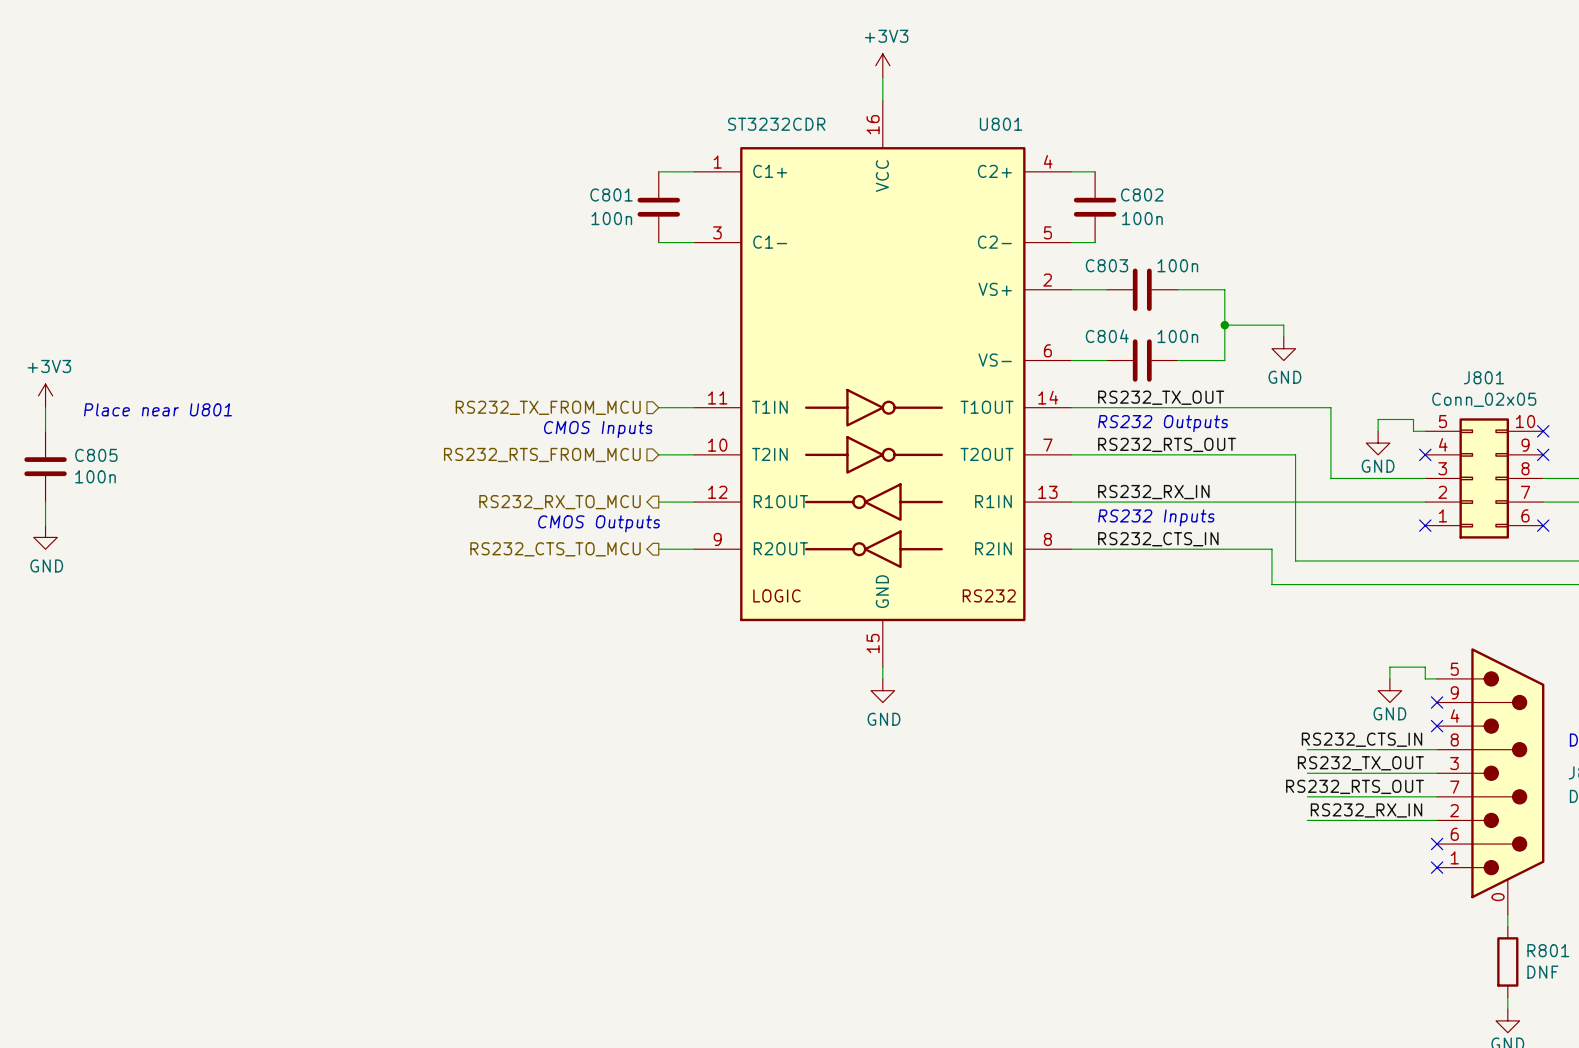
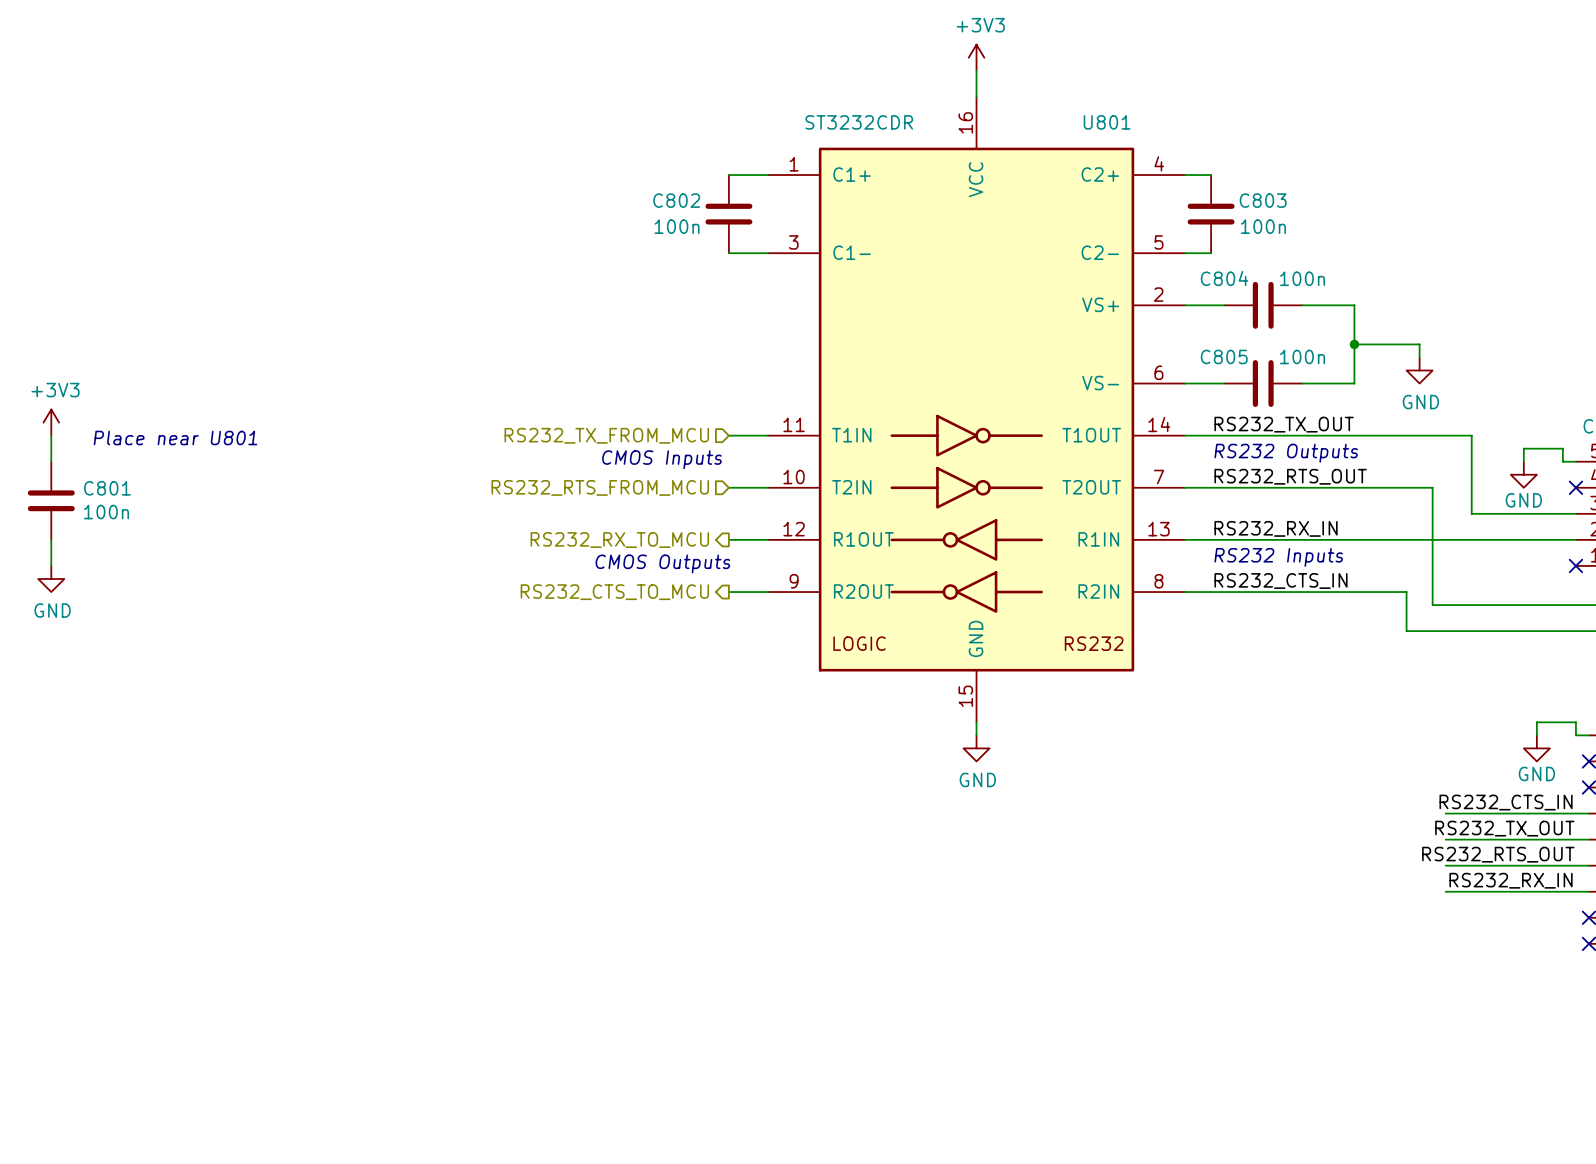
C801 name: C801 (611, 194) -> C802 (676, 200)
C802 name: C802 (1142, 194) -> C803 (1263, 200)
C803 name: C803 (1106, 265) -> C804 (1224, 278)
C804 name: C804 (1107, 336) -> C805 (1224, 356)
C805 name: C805 (96, 455) -> C801 (107, 488)

